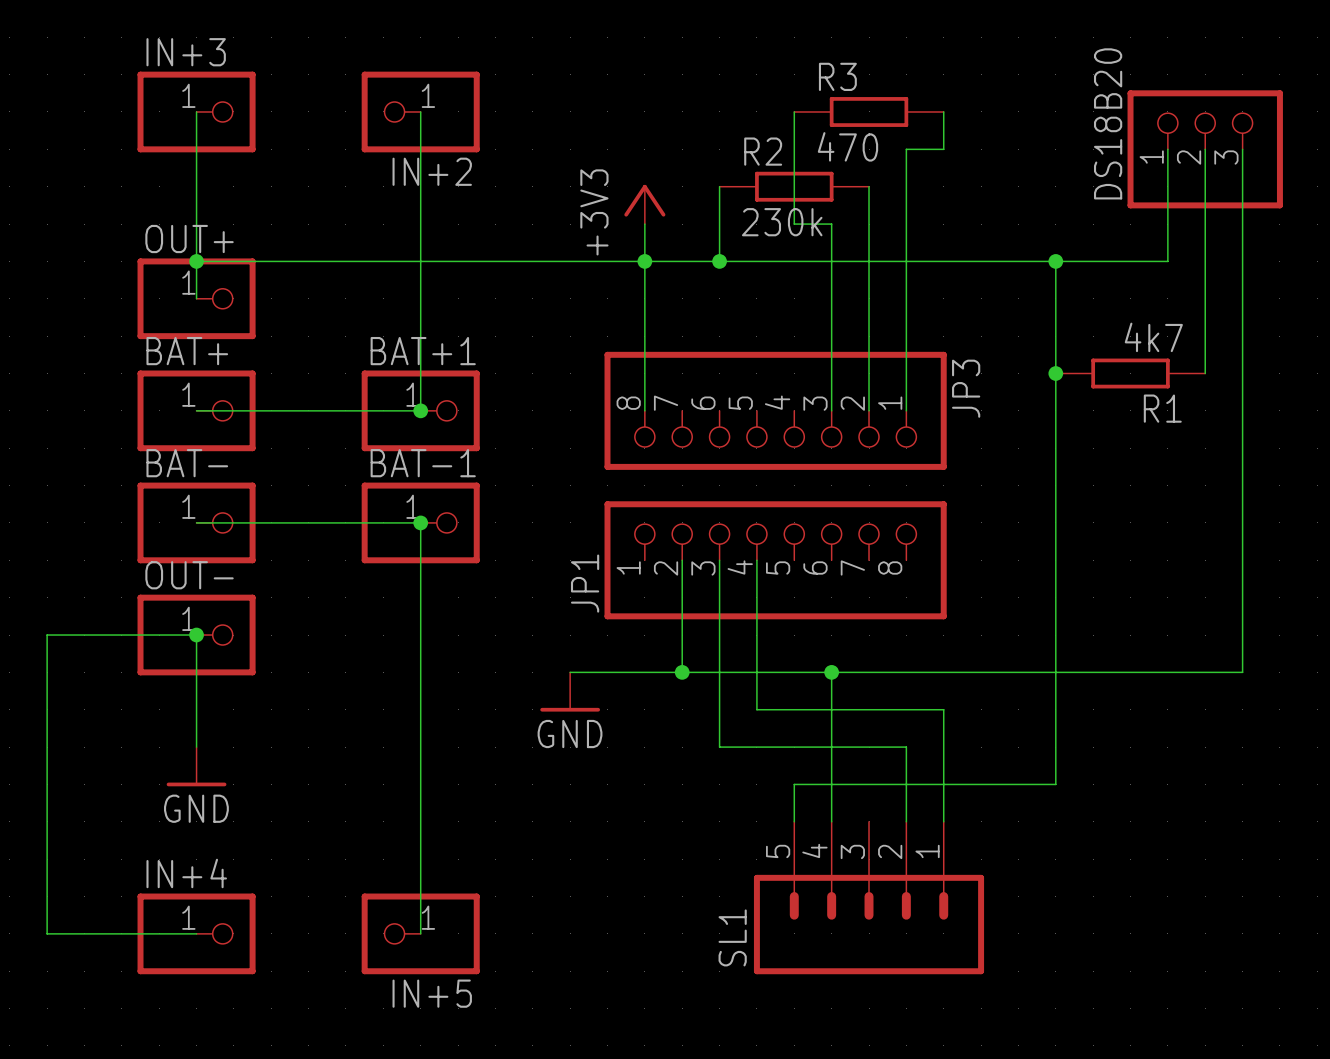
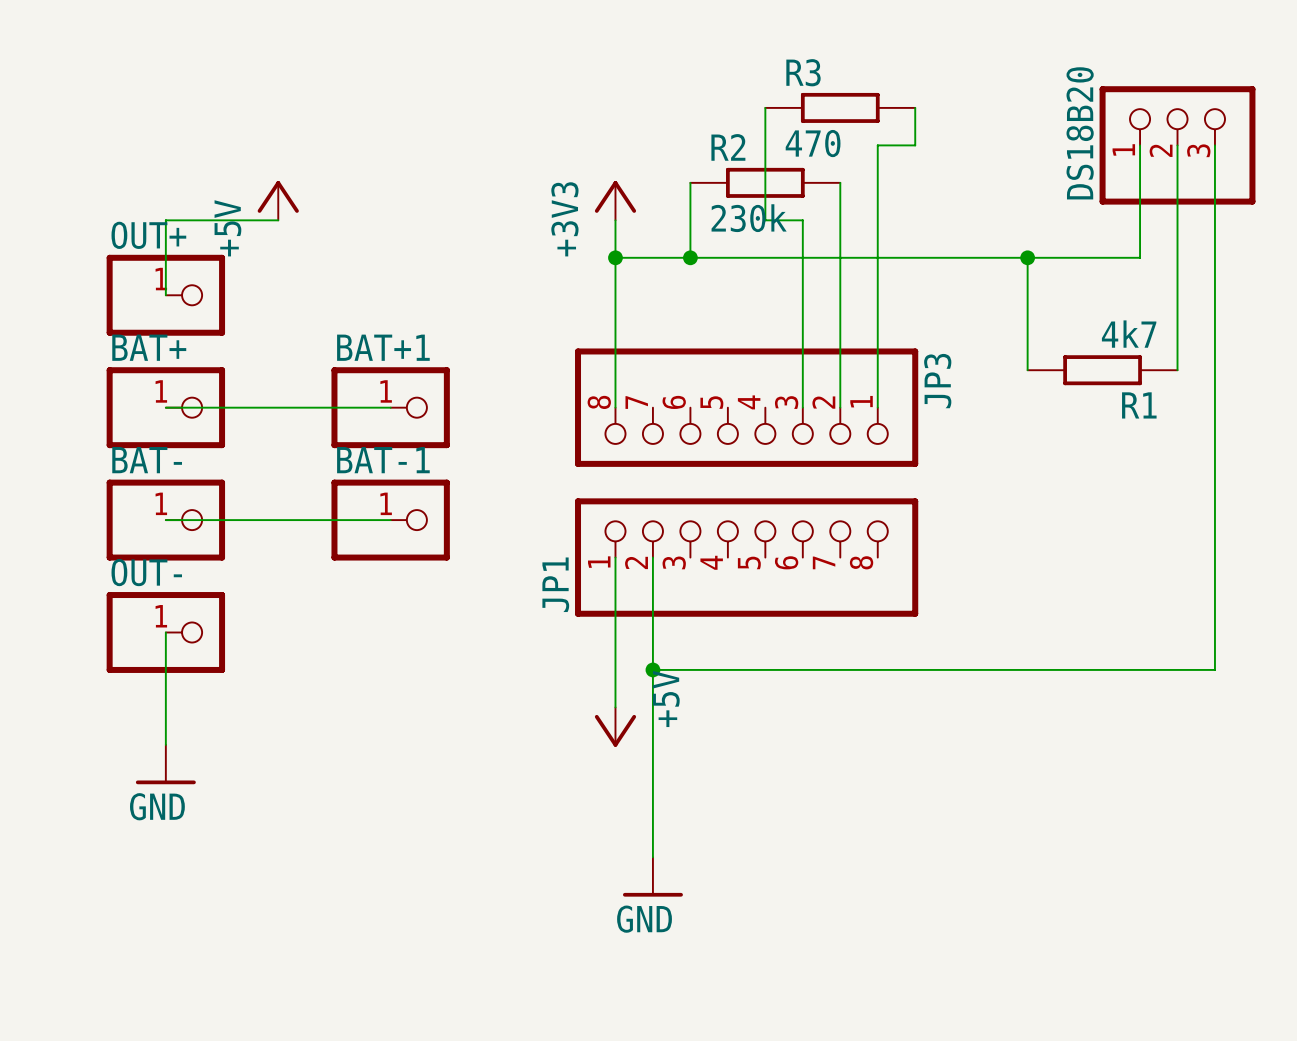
wire: (196, 111) (196, 224) -> (278, 220) (165, 220)
IN+3: (196, 111) -> none
wire: (420, 111) (420, 410) -> none
IN+2: (420, 111) -> none
power symbol: none -> +5V (278, 200)
wire: (196, 261) (644, 261) -> none
junction: (196, 261) -> none
wire: (1055, 373) (1055, 784) (794, 784) (794, 821) -> none
junction: (1055, 373) -> none
junction: (420, 410) -> none
wire: (420, 522) (420, 933) -> none
junction: (420, 522) -> none
wire: (719, 560) (719, 747) (906, 747) (906, 821) -> none
wire: (756, 560) (756, 709) (943, 709) (943, 821) -> none
wire: (196, 635) (47, 635) (47, 933) (196, 933) -> none
junction: (196, 635) -> none
wire: (570, 672) (682, 672) -> (652, 857) (652, 669)
wire: (831, 672) (831, 821) -> (615, 557) (615, 707)
junction: (831, 672) -> none
power symbol position: GND (570, 691) -> GND (652, 876)
power symbol: none -> +5V (615, 727)
SL1: (869, 898) -> none
IN+4: (196, 933) -> none
IN+5: (420, 933) -> none

